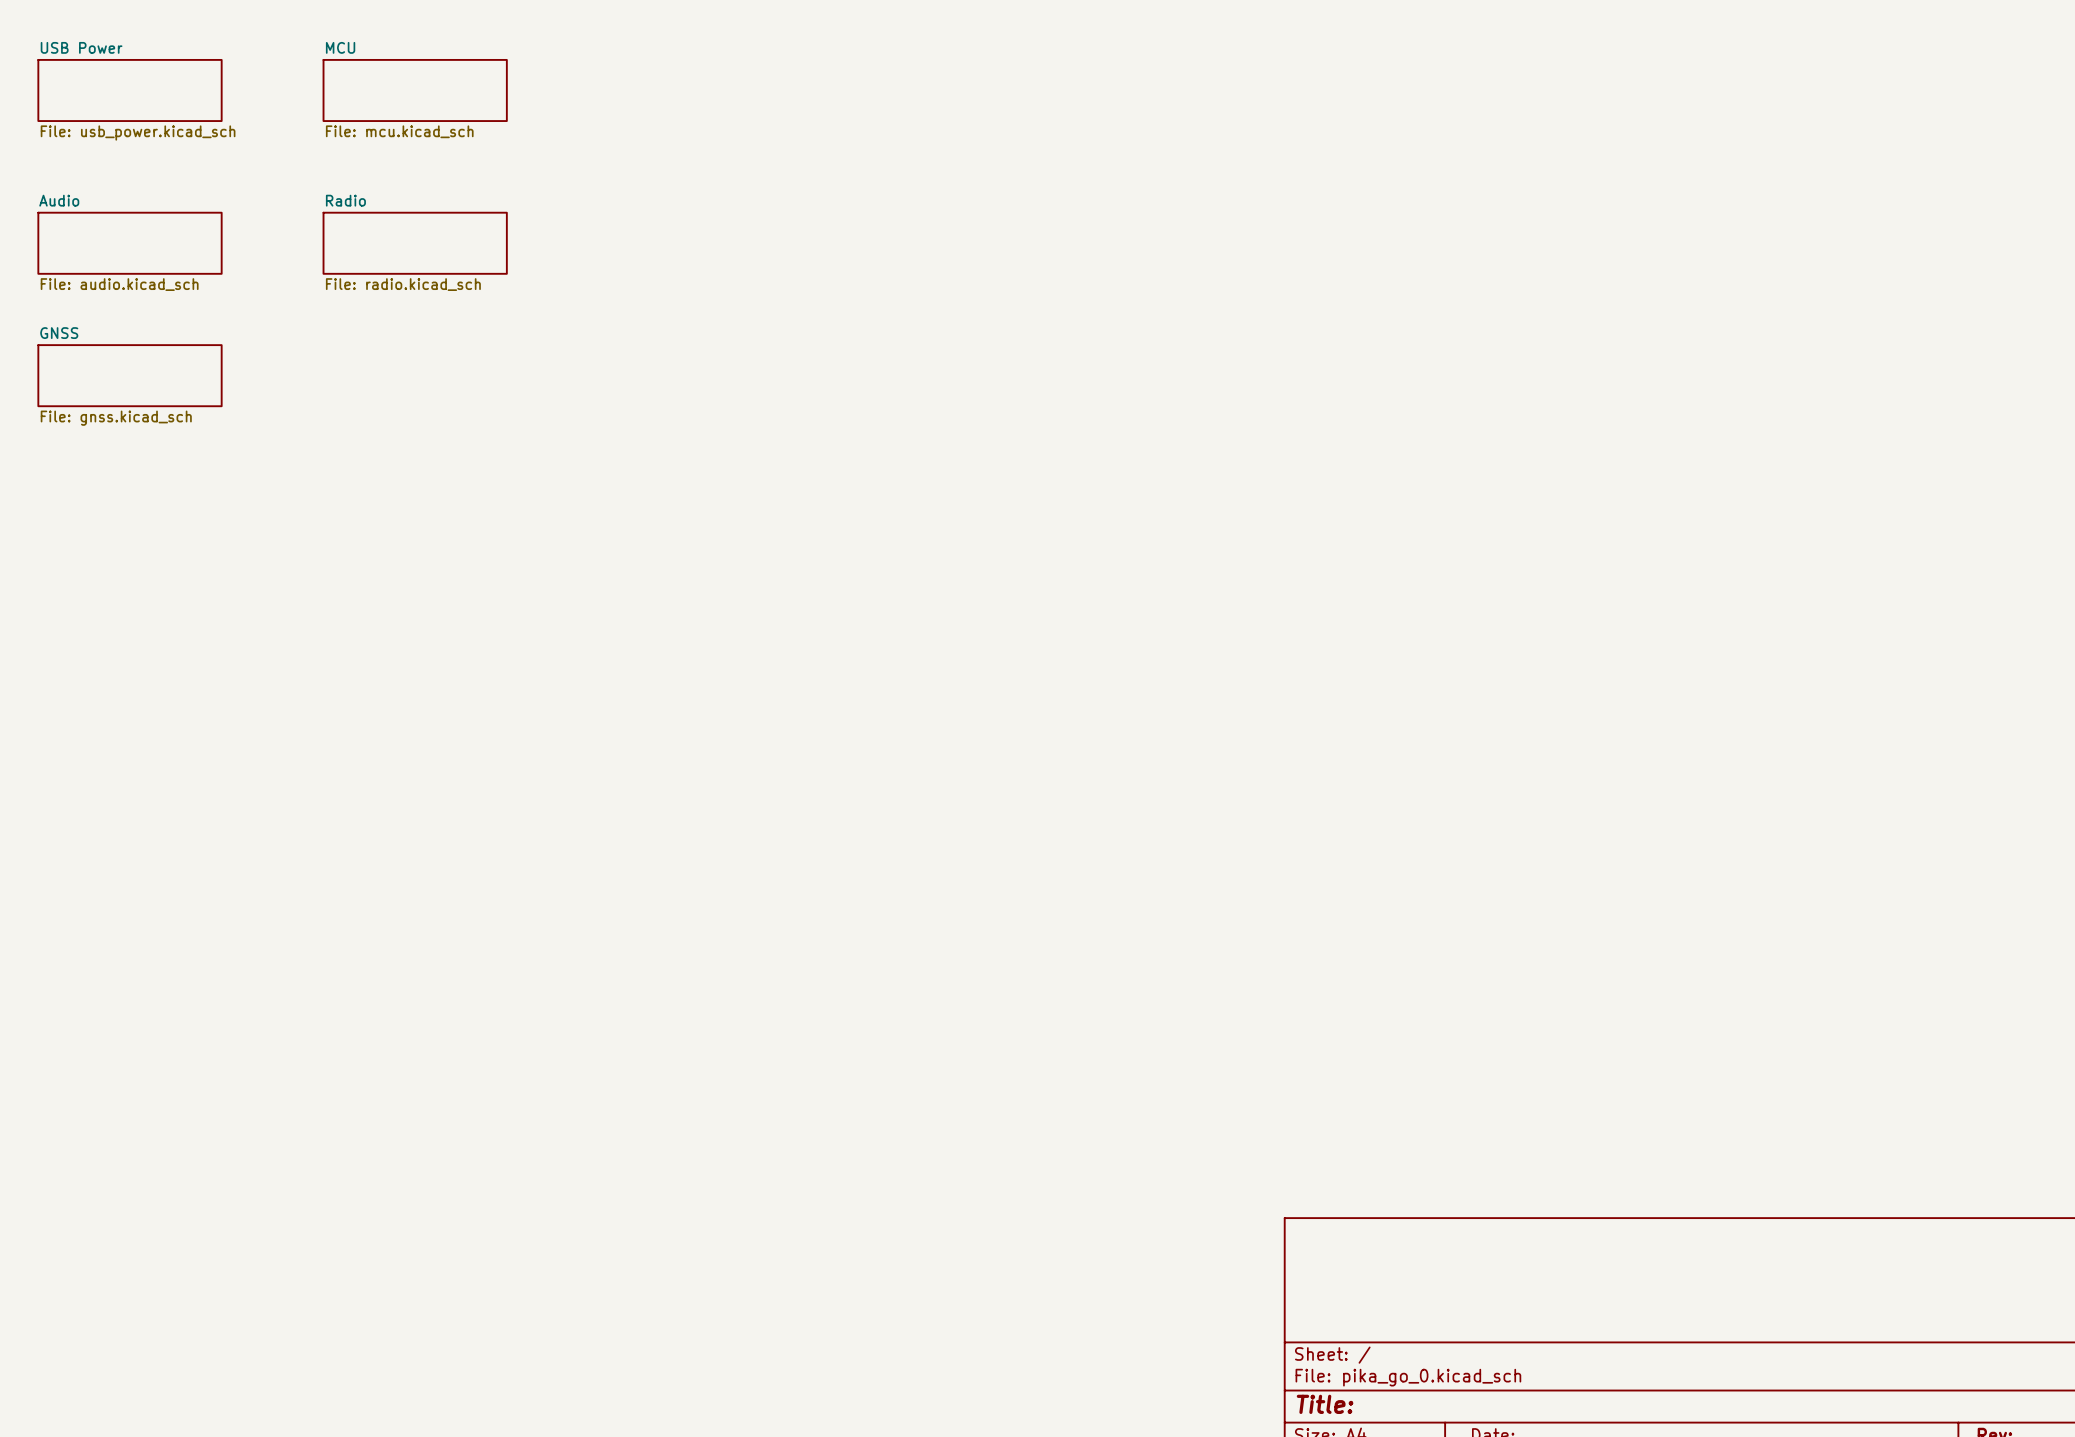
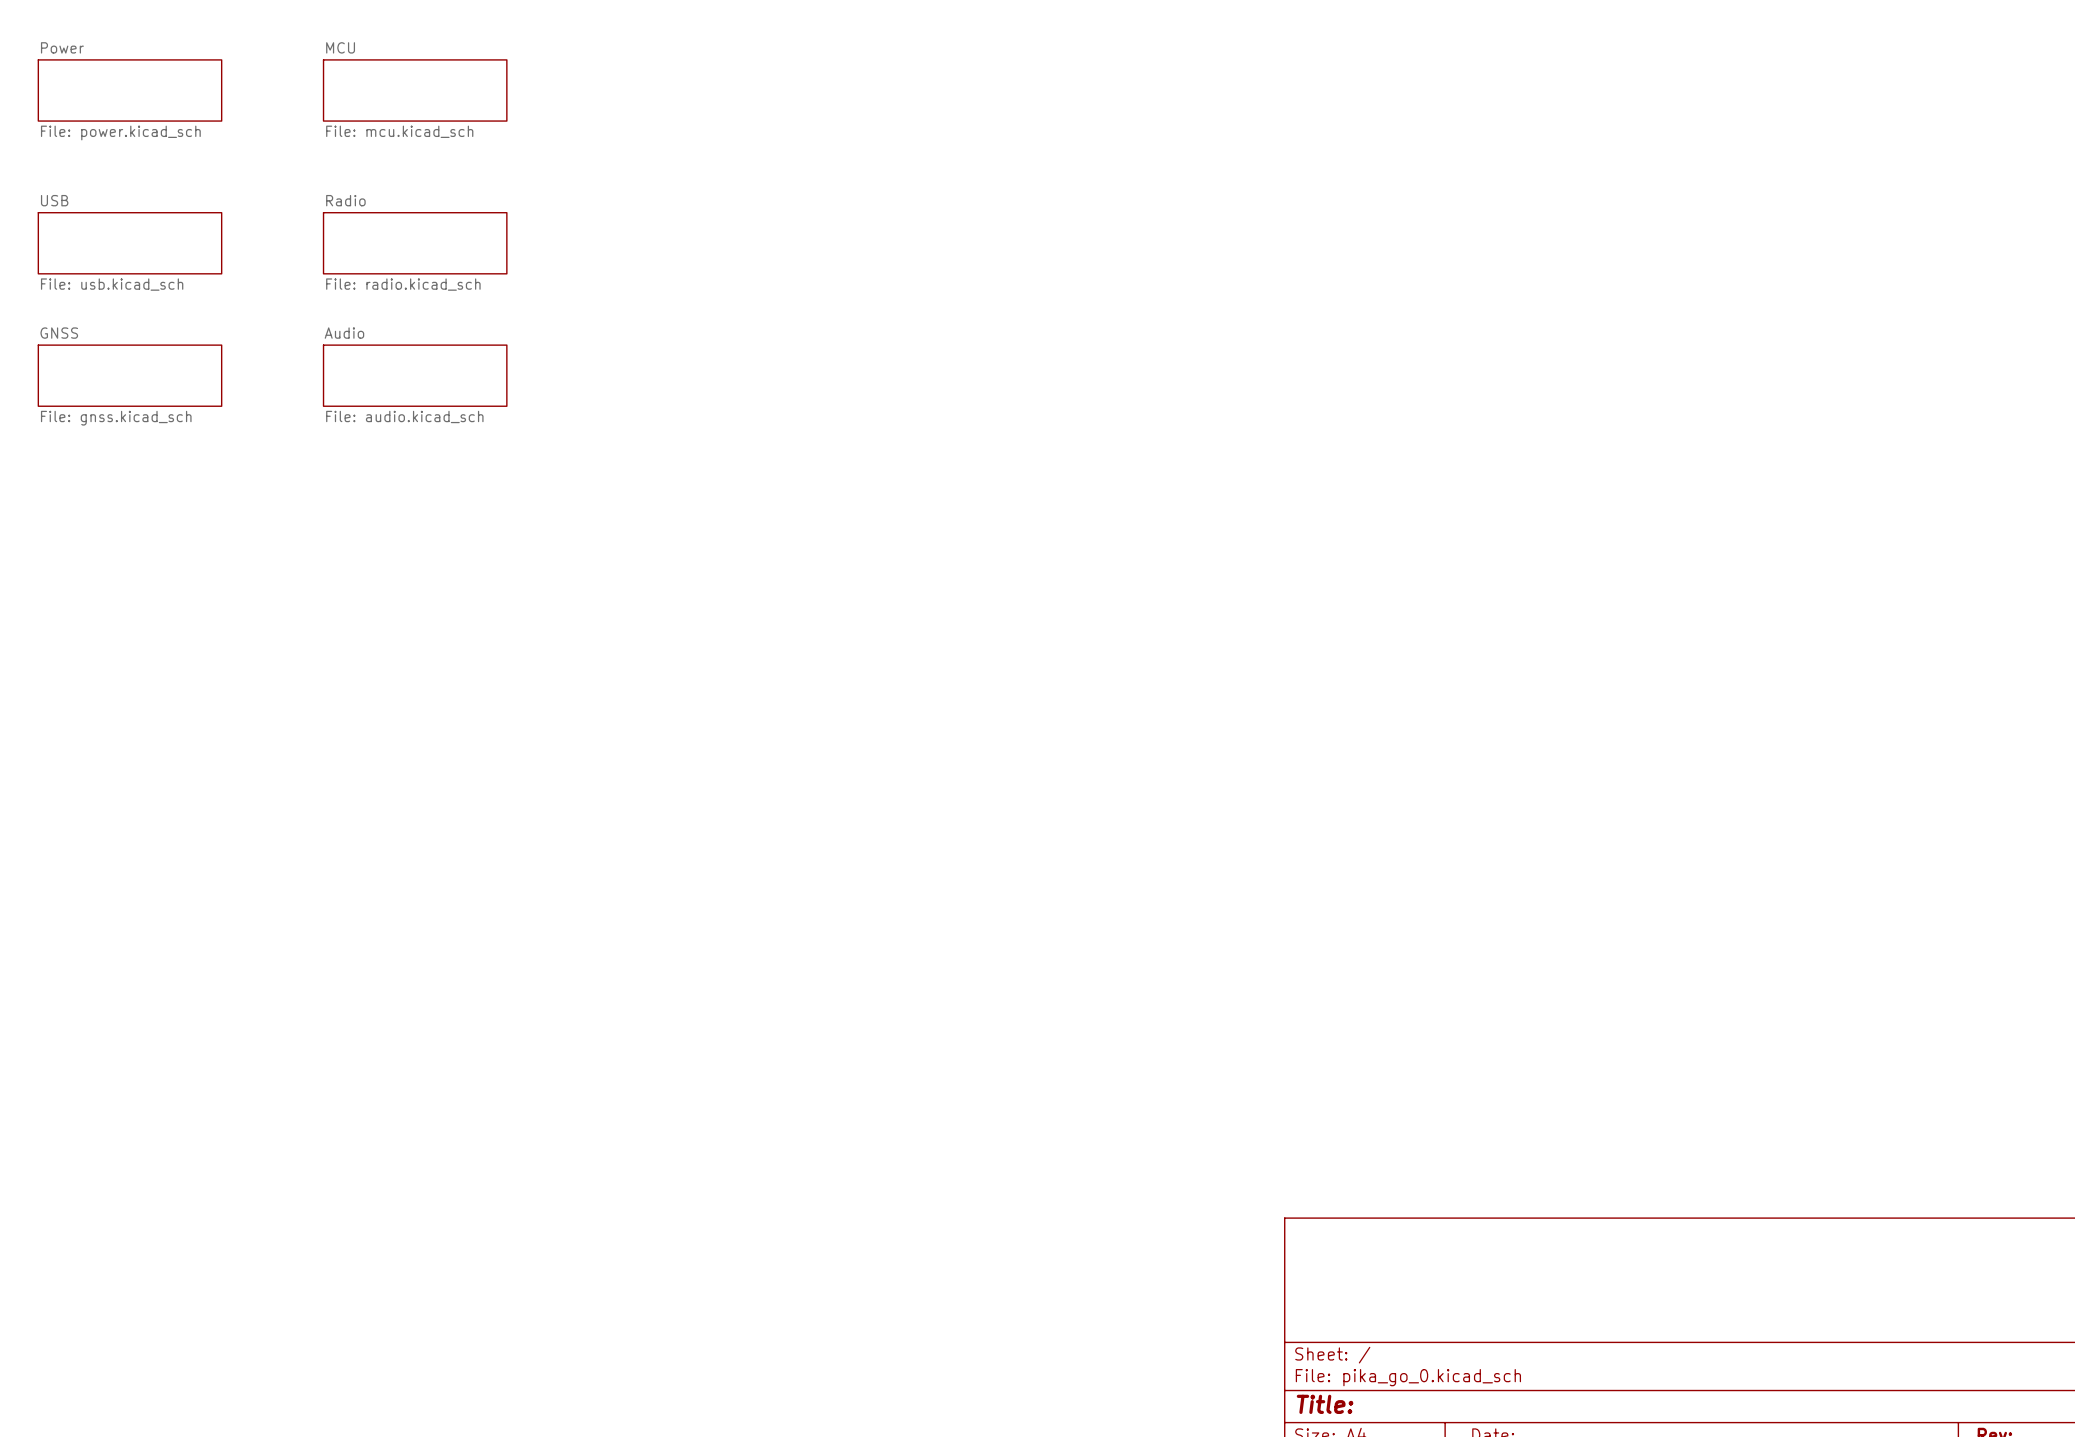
sheet USB Power name: USB Power (81, 47) -> Power (62, 47)
sheet USB Power value: File: usb_power.kicad_sch (138, 133) -> File: power.kicad_sch (120, 133)
sheet Audio name: Audio (59, 200) -> USB (54, 200)
sheet Audio value: File: audio.kicad_sch (119, 284) -> File: usb.kicad_sch (112, 284)
sheet Audio: none -> File: audio.kicad_sch (415, 375)

